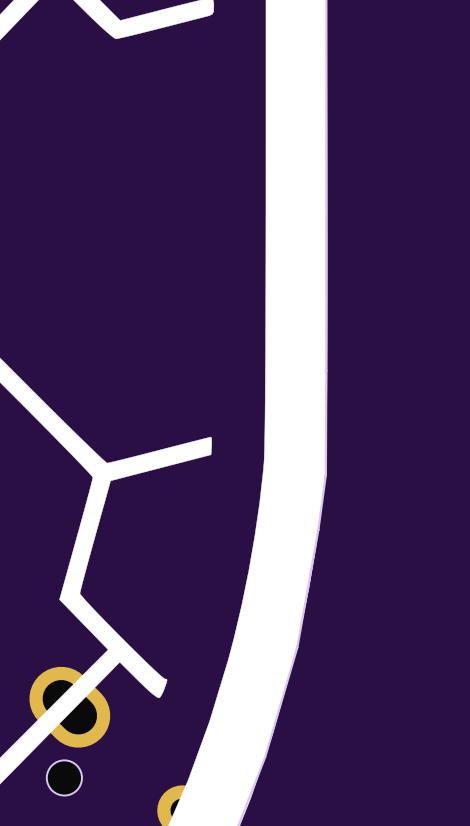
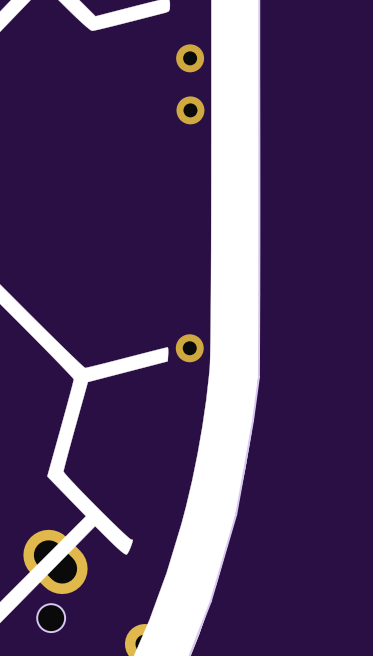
via: none -> (190, 58)
via: none -> (190, 110)
via: none -> (189, 348)

